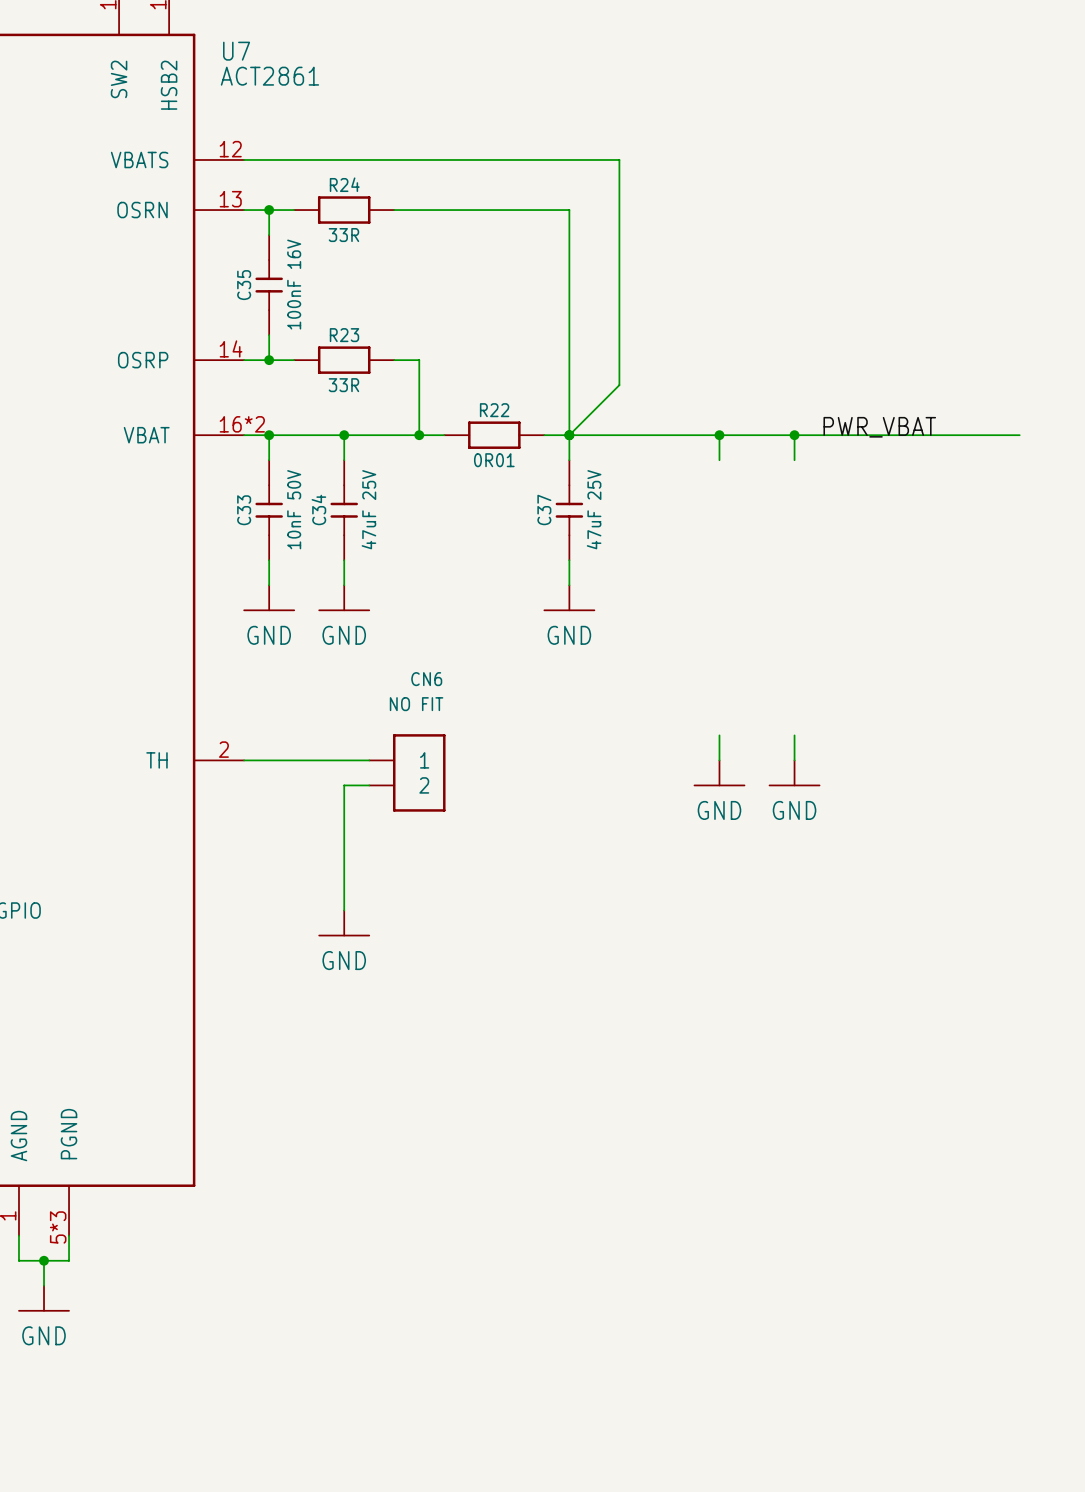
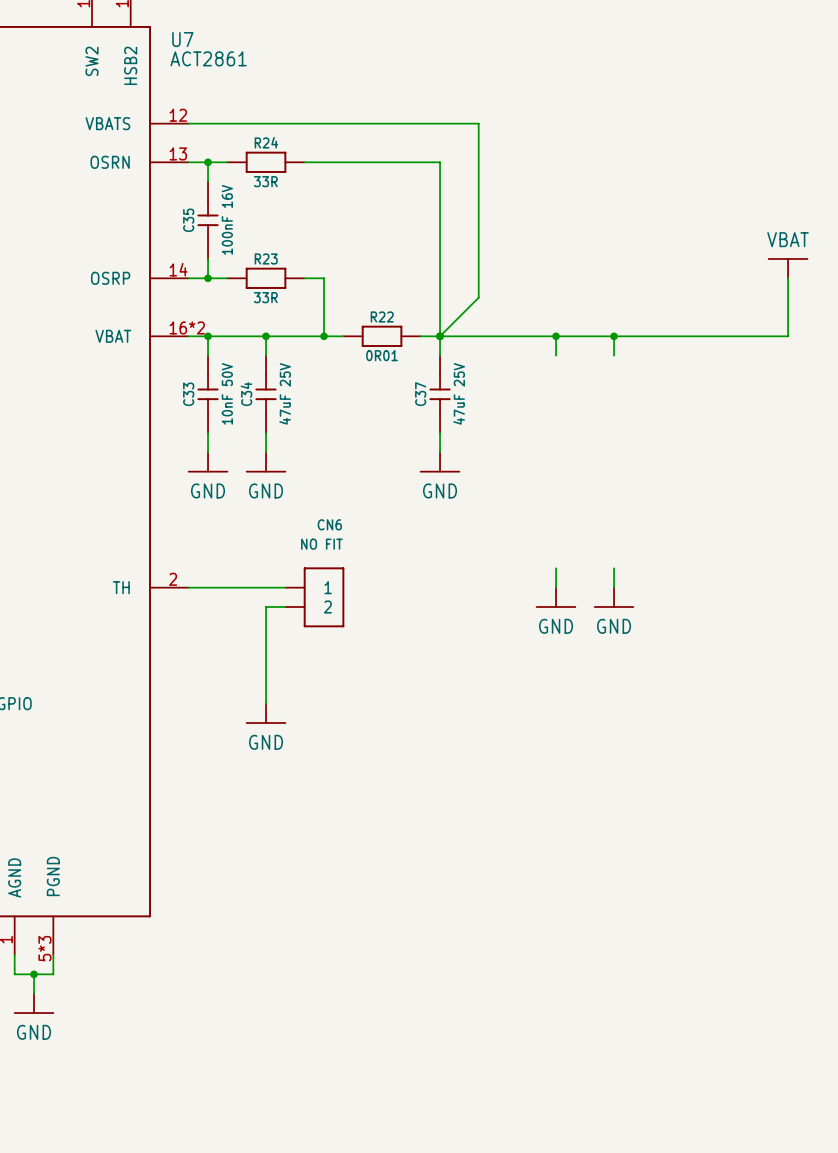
power symbol: none -> VBAT (788, 268)
wire: none -> (788, 278) (788, 336)
label: PWR_VBAT (879, 427) -> none

